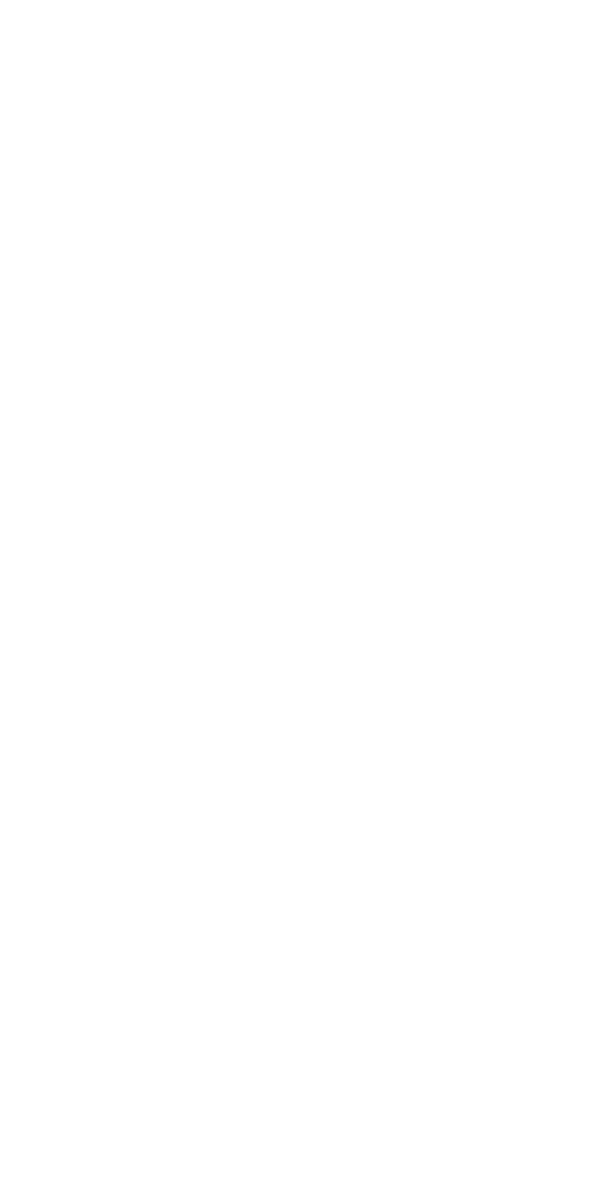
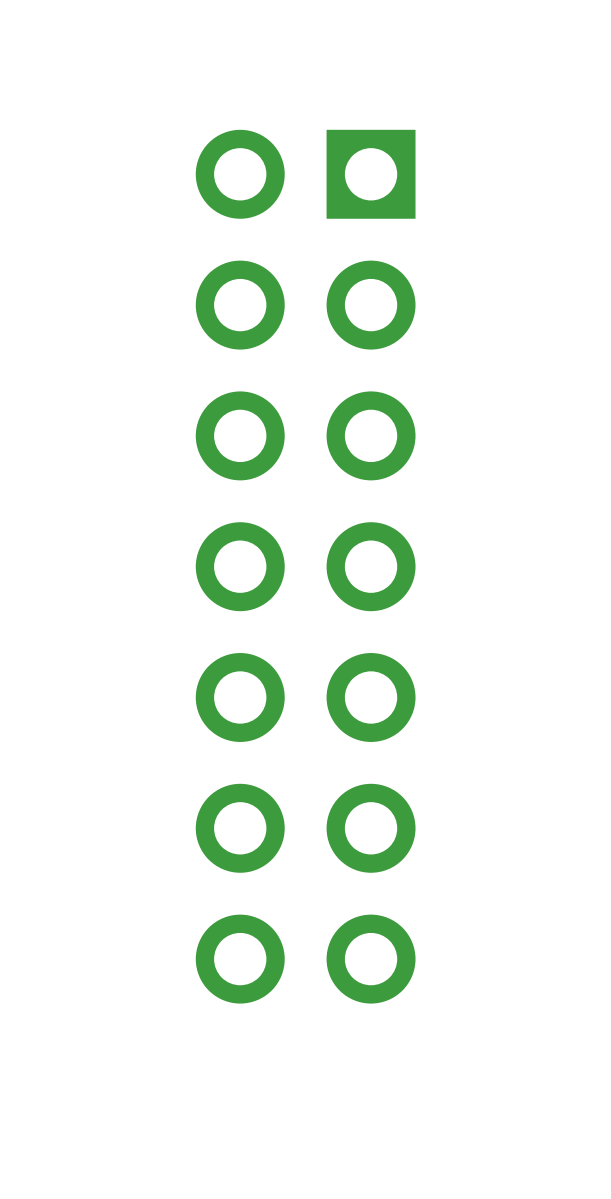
part: none -> (305, 566)

